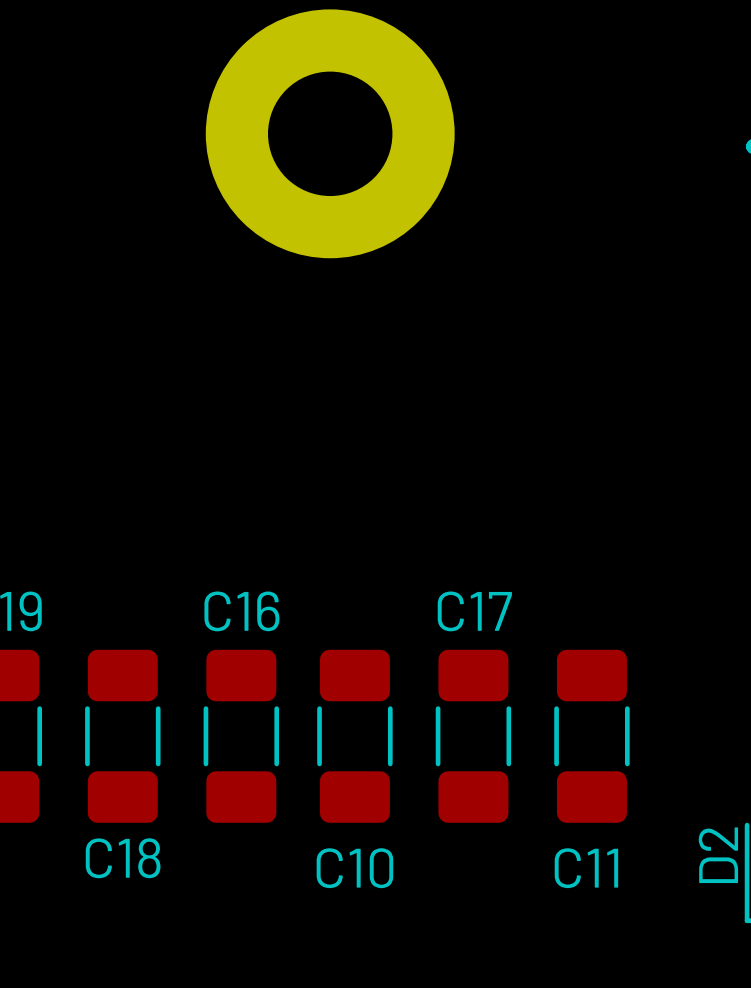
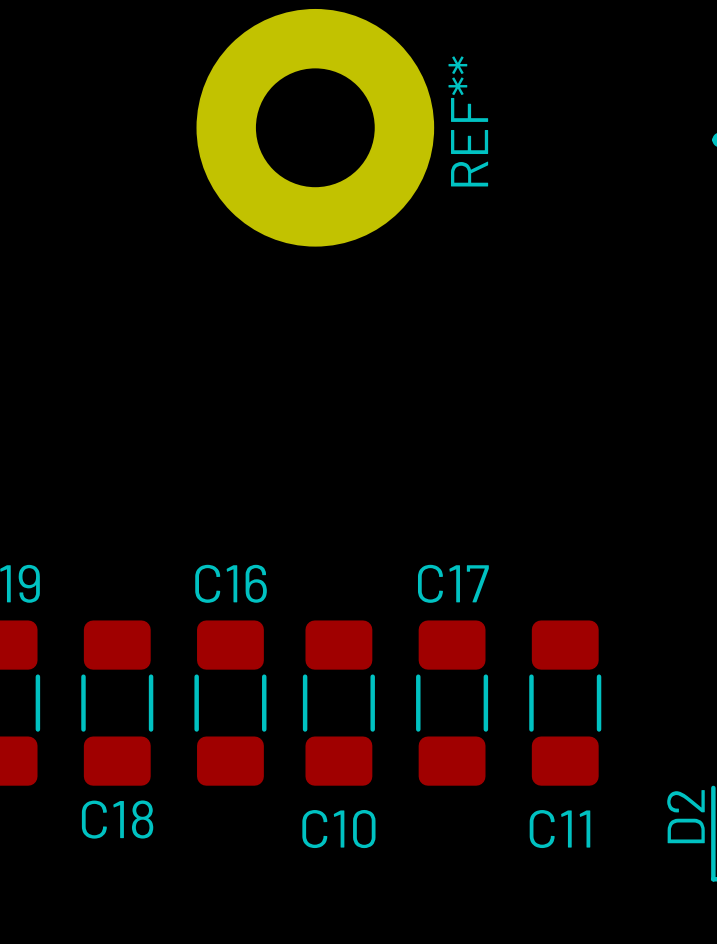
REF** name: none -> REF** (468, 121)

